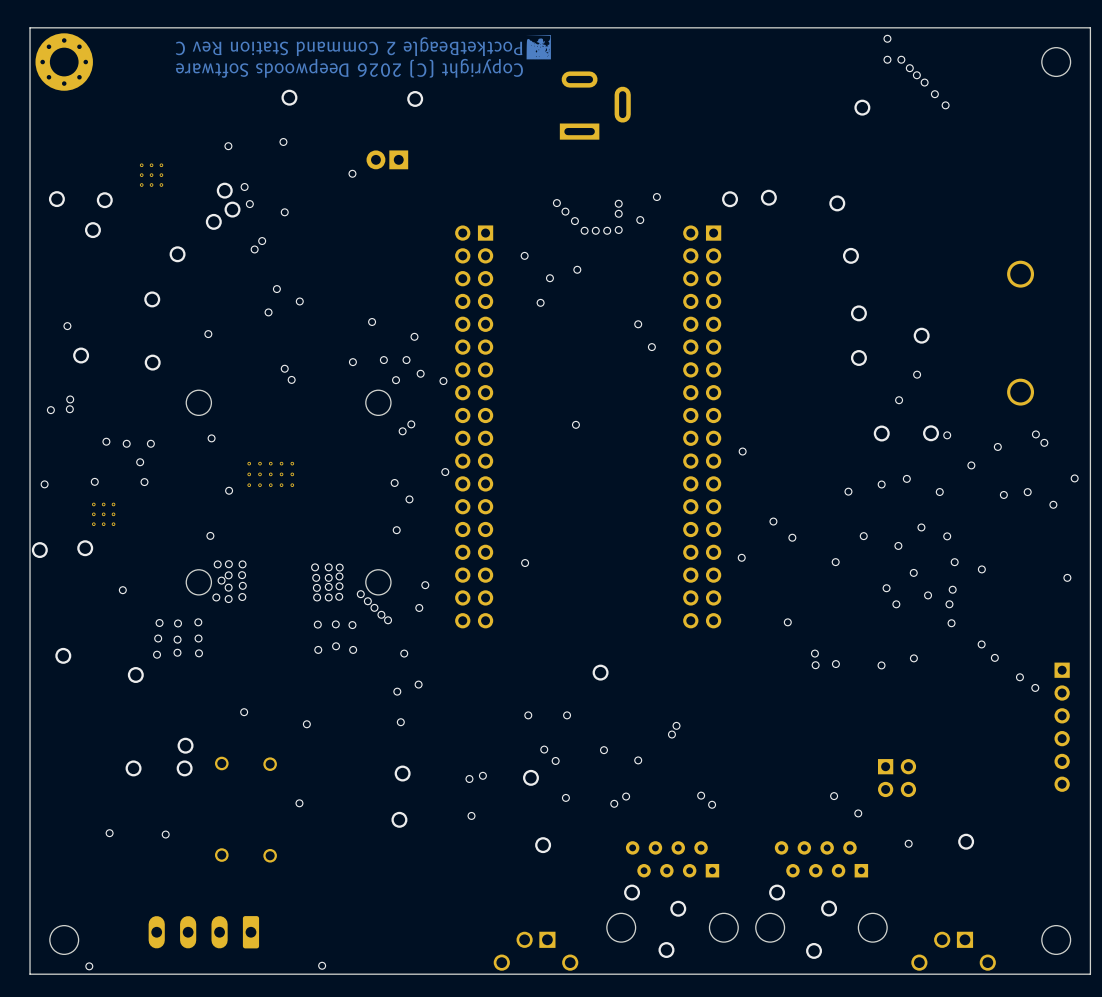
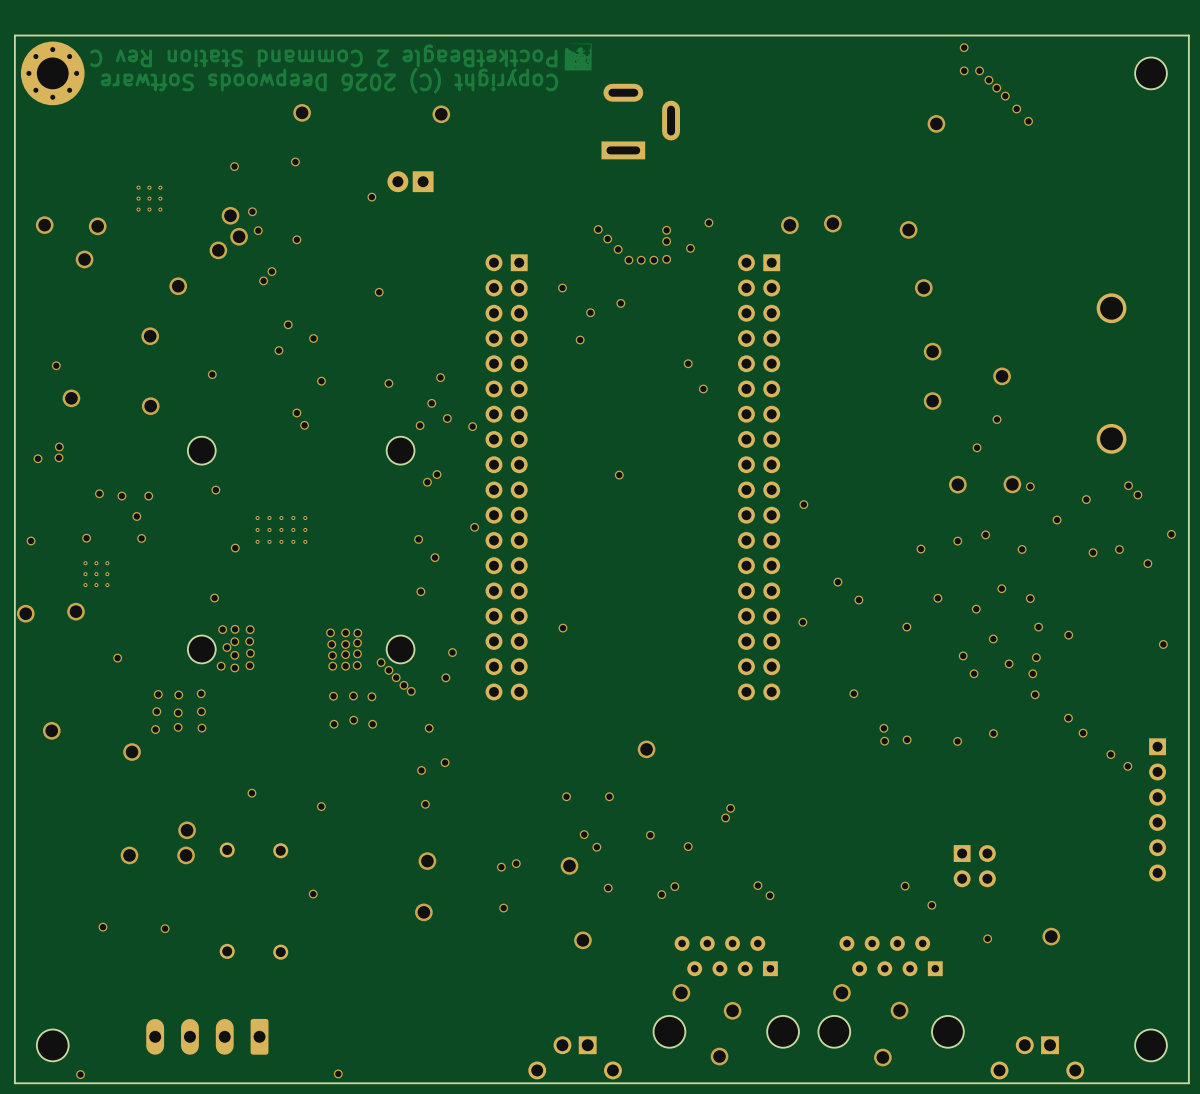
via: none -> (379, 292)
via: (372, 322) -> none
via: none -> (321, 381)
via: none -> (388, 383)
via: (383, 360) -> none
via: (352, 362) -> none

